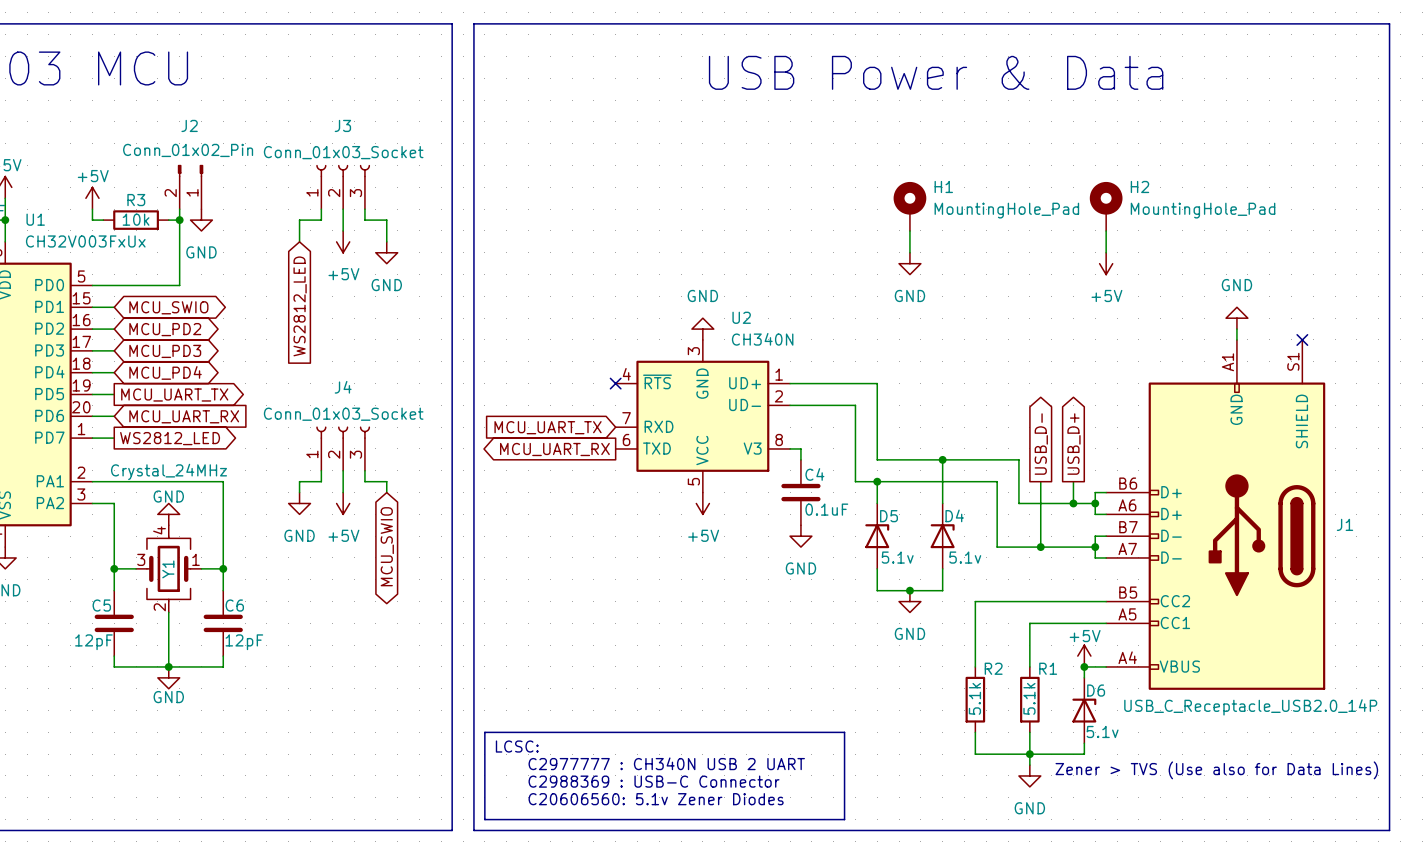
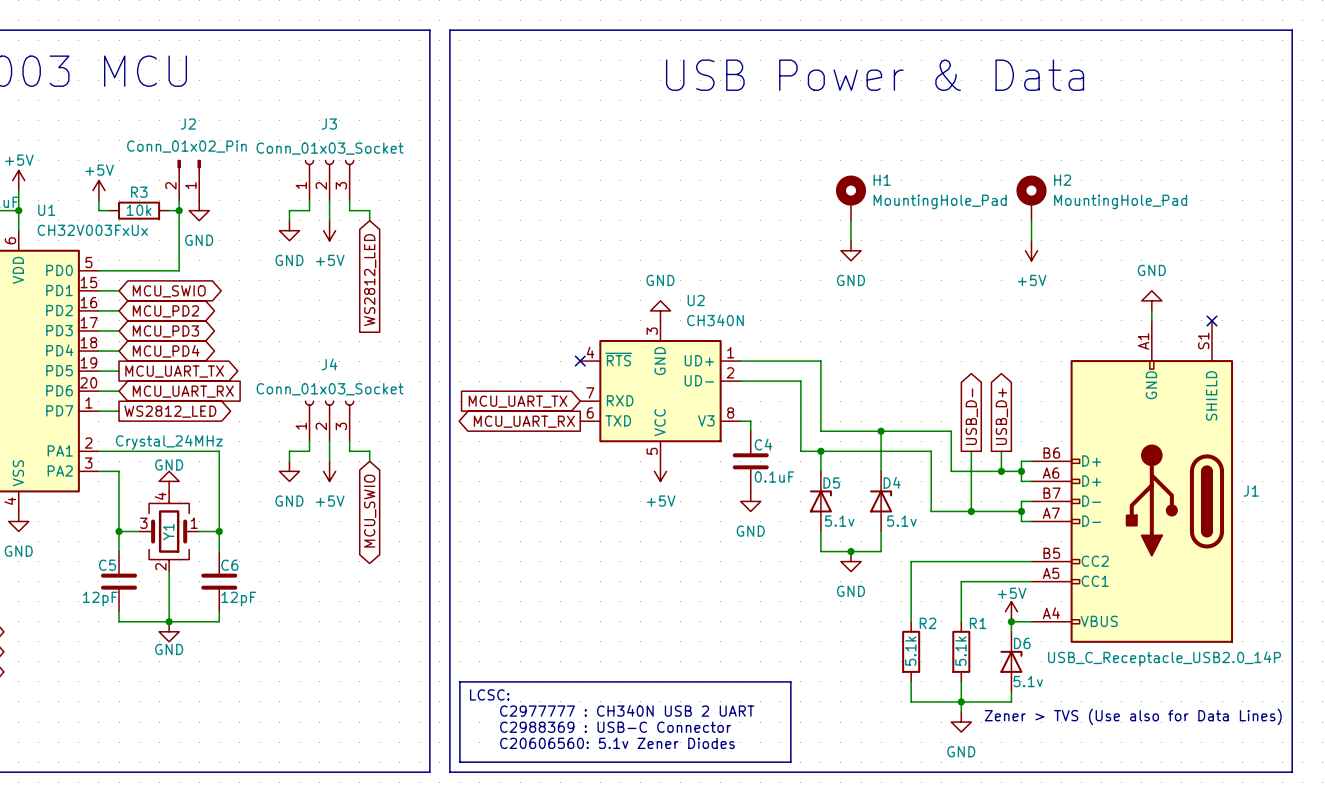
wire: (386, 230) (386, 241) -> none
power symbol position: GND (386, 252) -> GND (289, 230)
global label position: WS2812_LED (300, 306) -> WS2812_LED (370, 280)

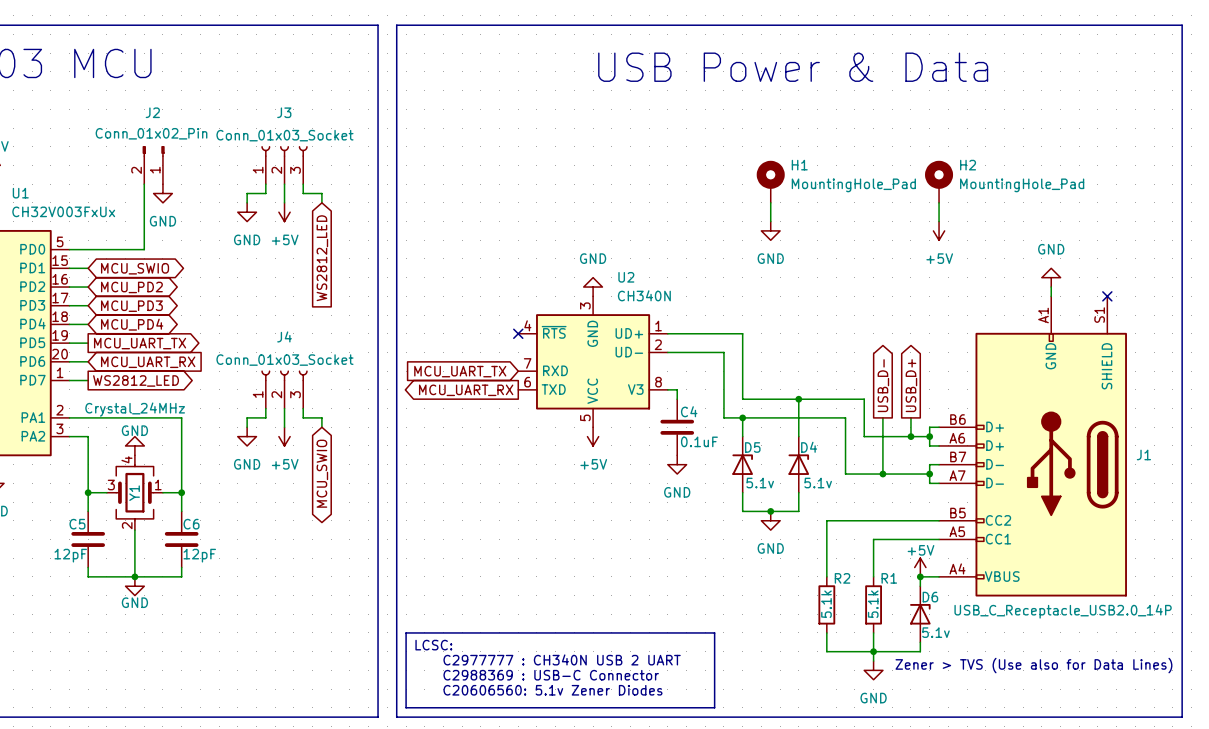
power symbol: +5V (98, 190) -> none
wire: (98, 200) (98, 210) (108, 210) -> none
R3: 10k (139, 210) -> none
wire: (169, 210) (179, 210) -> none
junction: (179, 210) -> none

